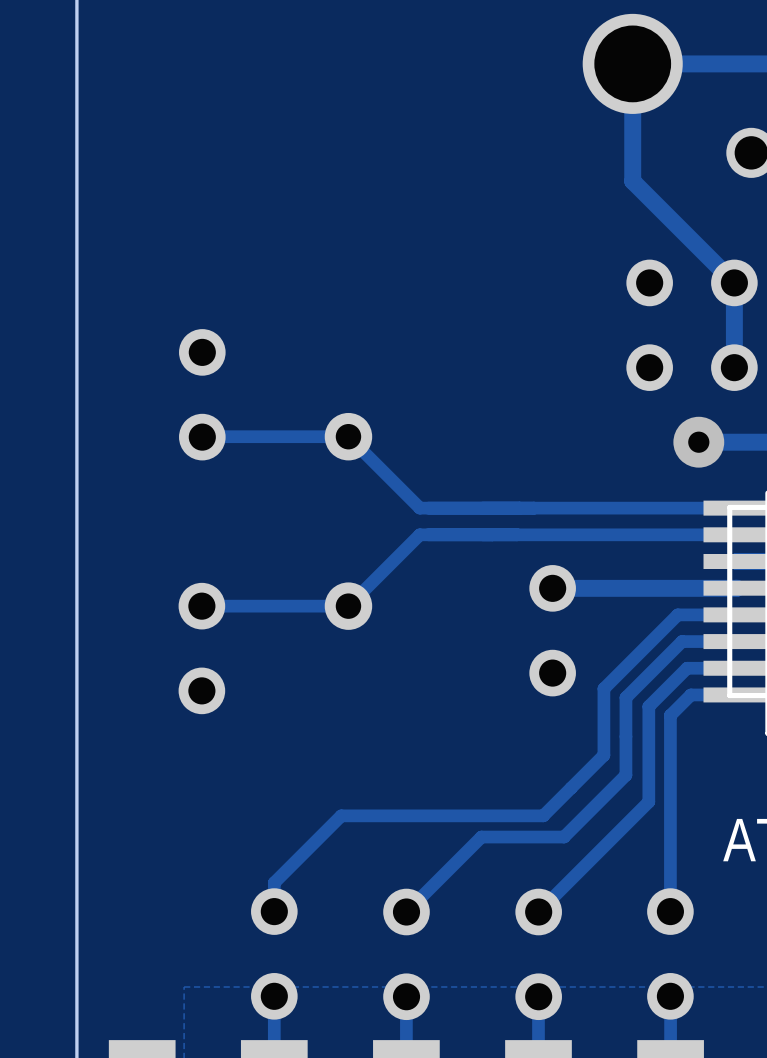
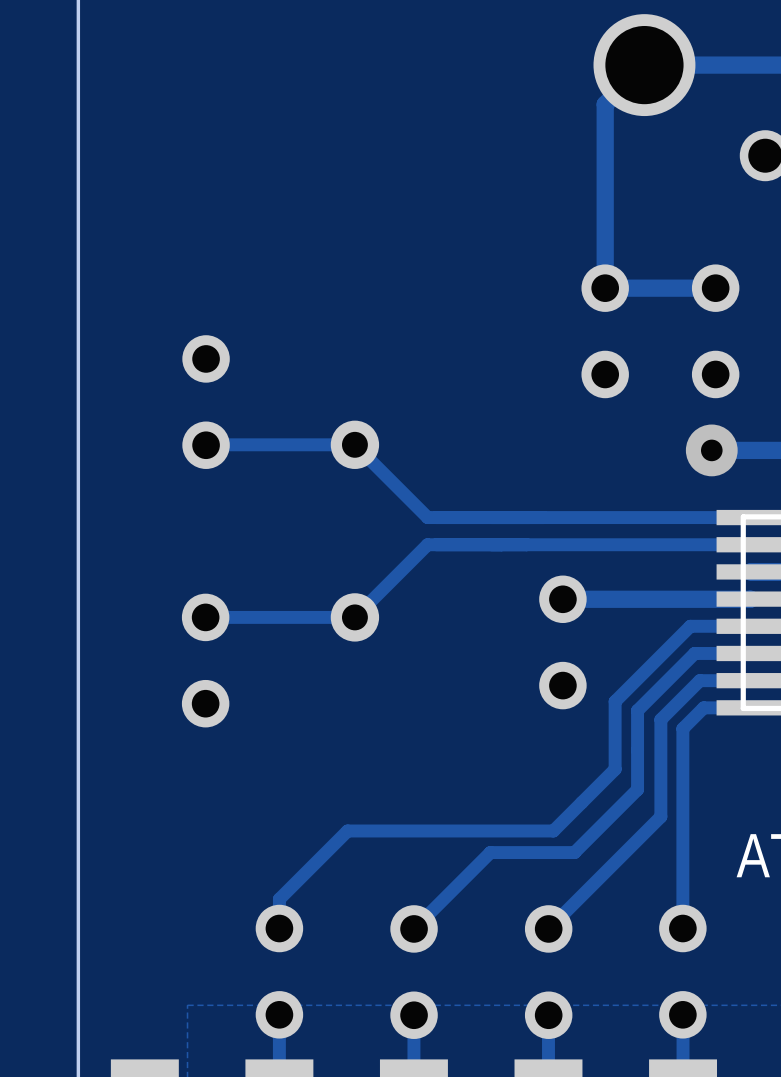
track: (632, 63) (632, 181) (734, 282) (734, 367) -> (644, 65) (605, 104) (605, 288) (715, 288)
part: (692, 282) -> none
part: none -> (605, 331)
part: none -> (715, 331)
part: (692, 367) -> none

